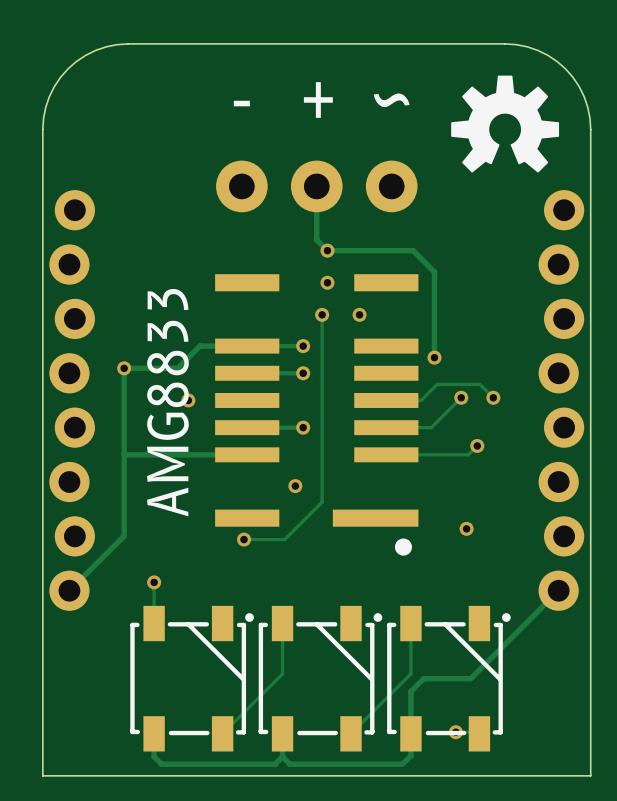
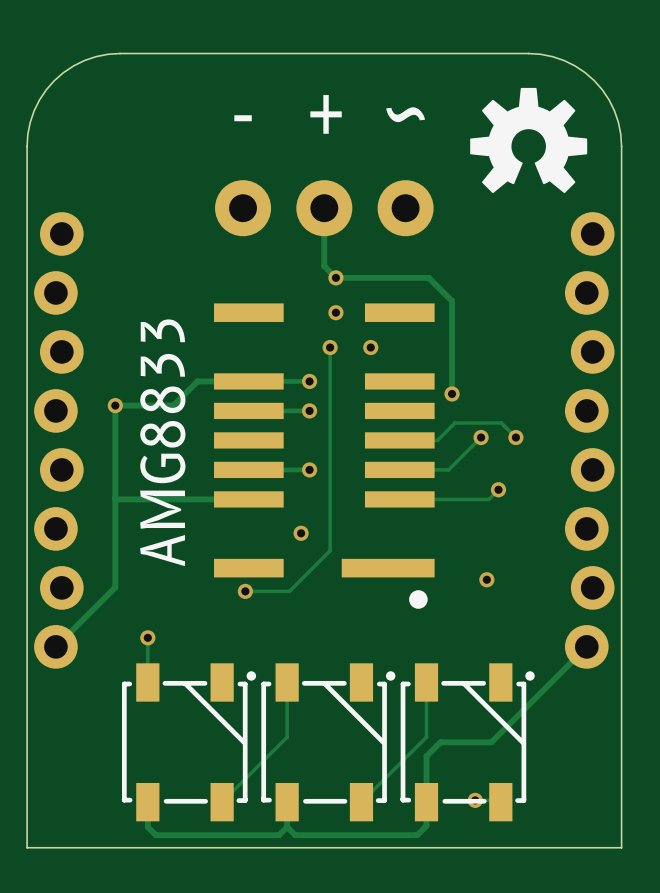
via: (188, 400) -> none

